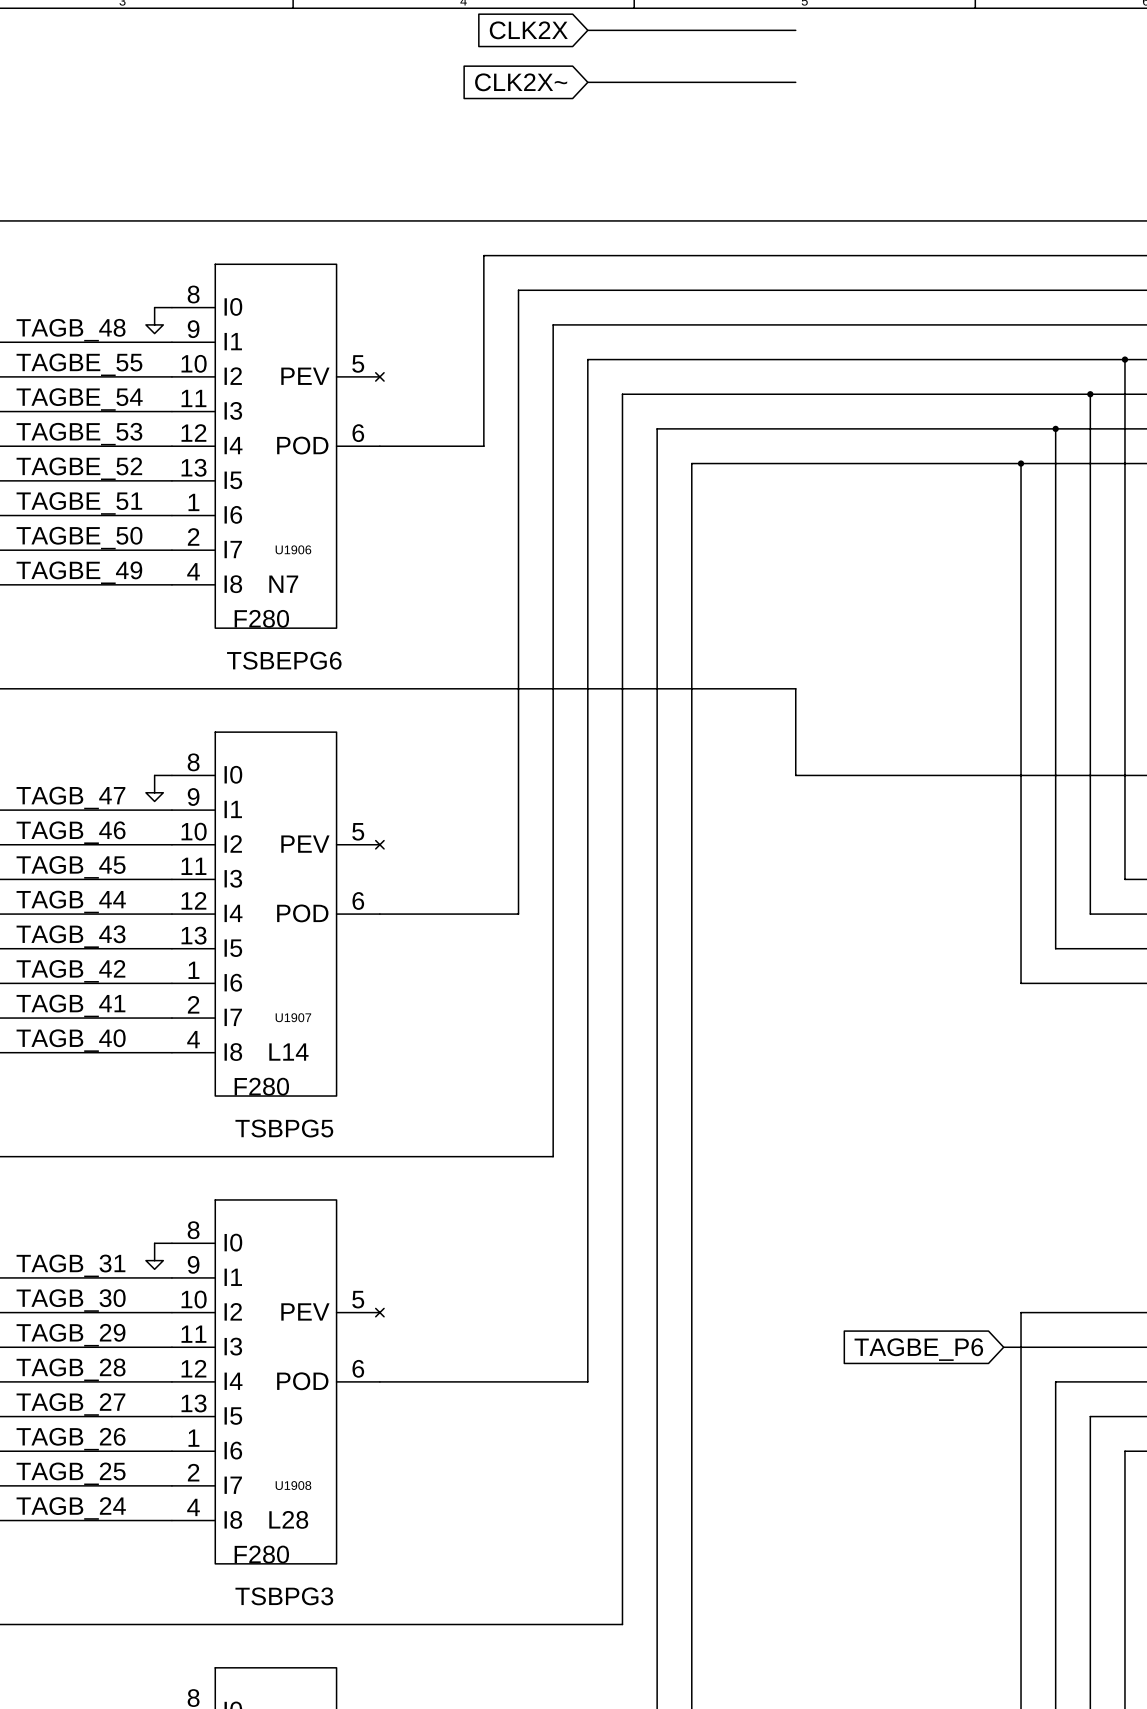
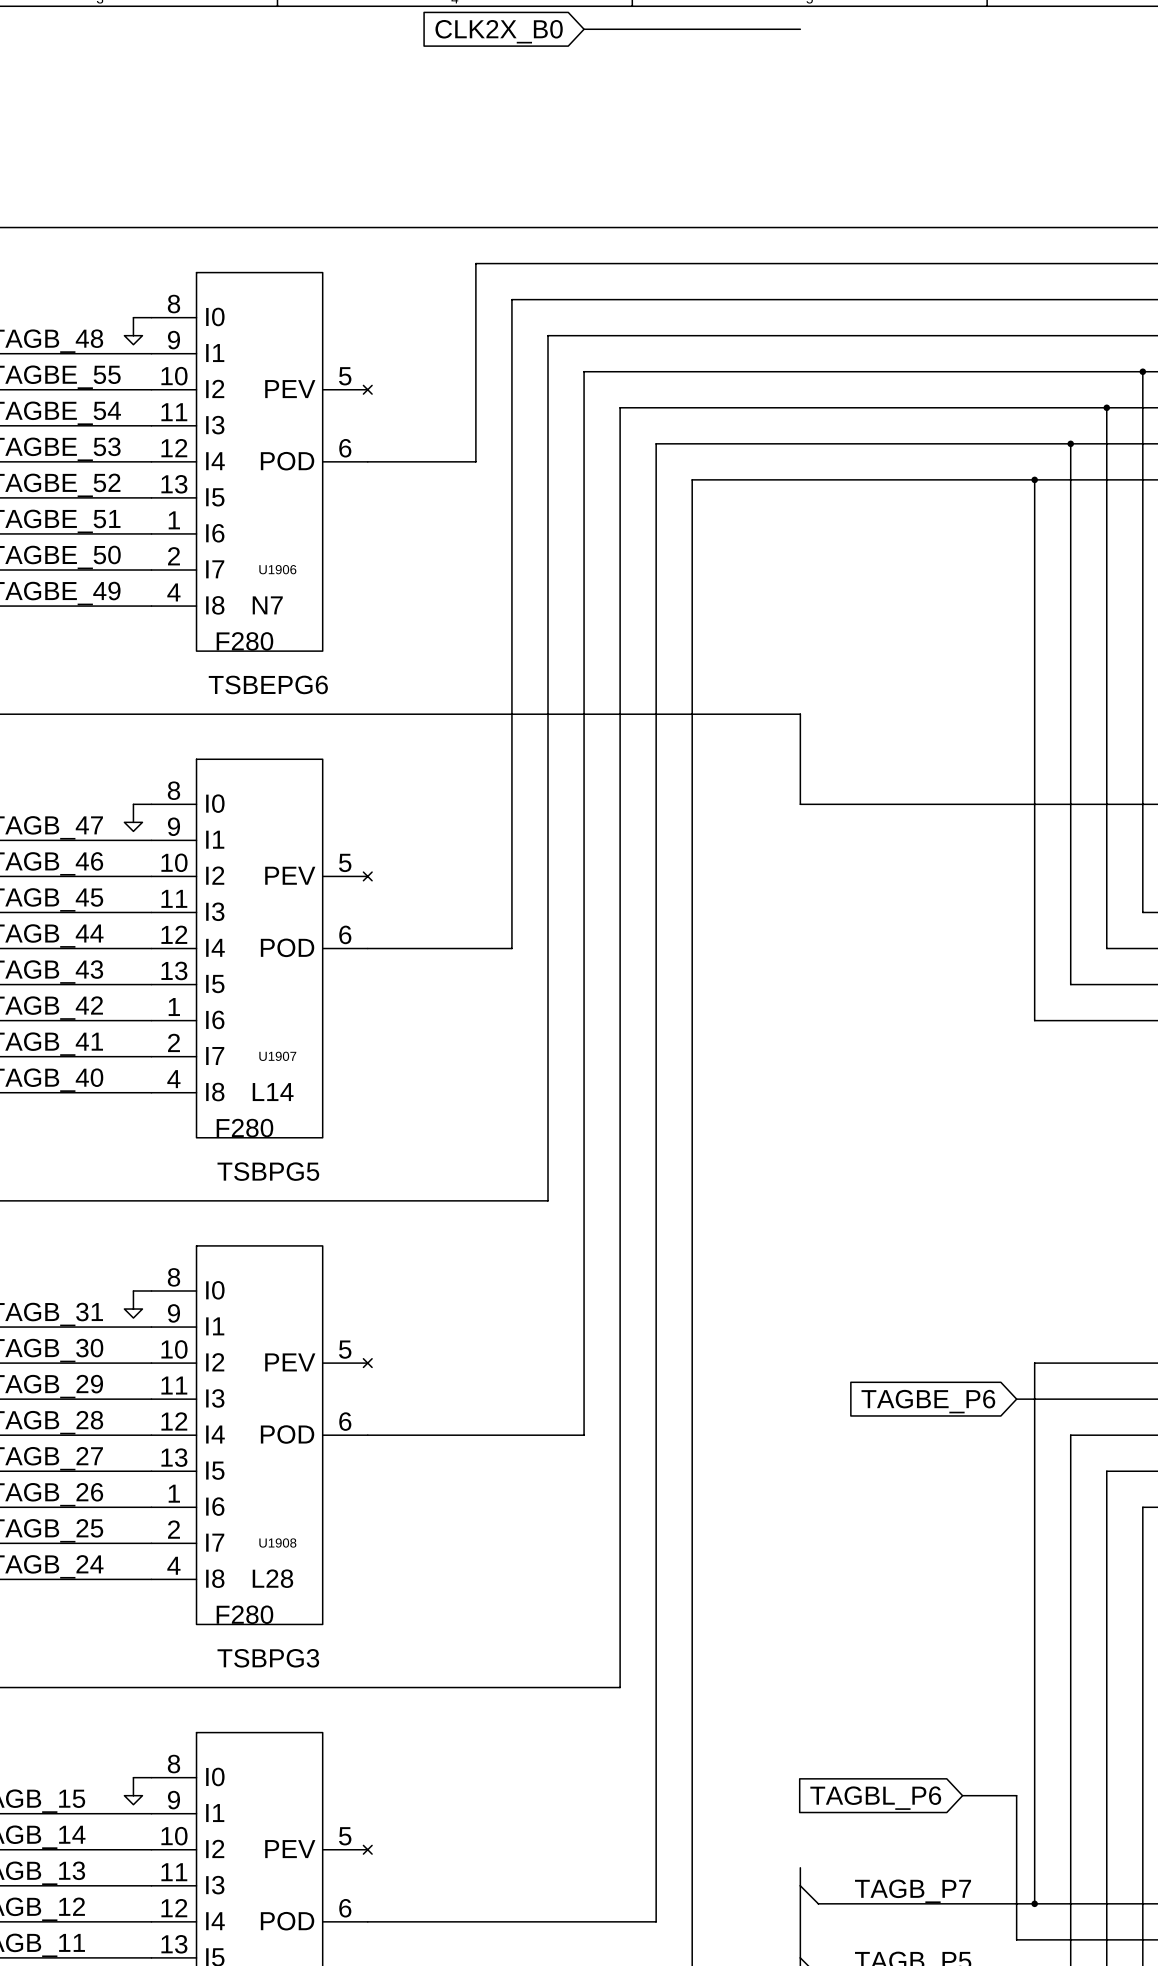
global label: CLK2X (528, 30) -> CLK2X_B0 (499, 31)
global label: CLK2X~ (521, 82) -> none
wire: (587, 82) (795, 82) -> none

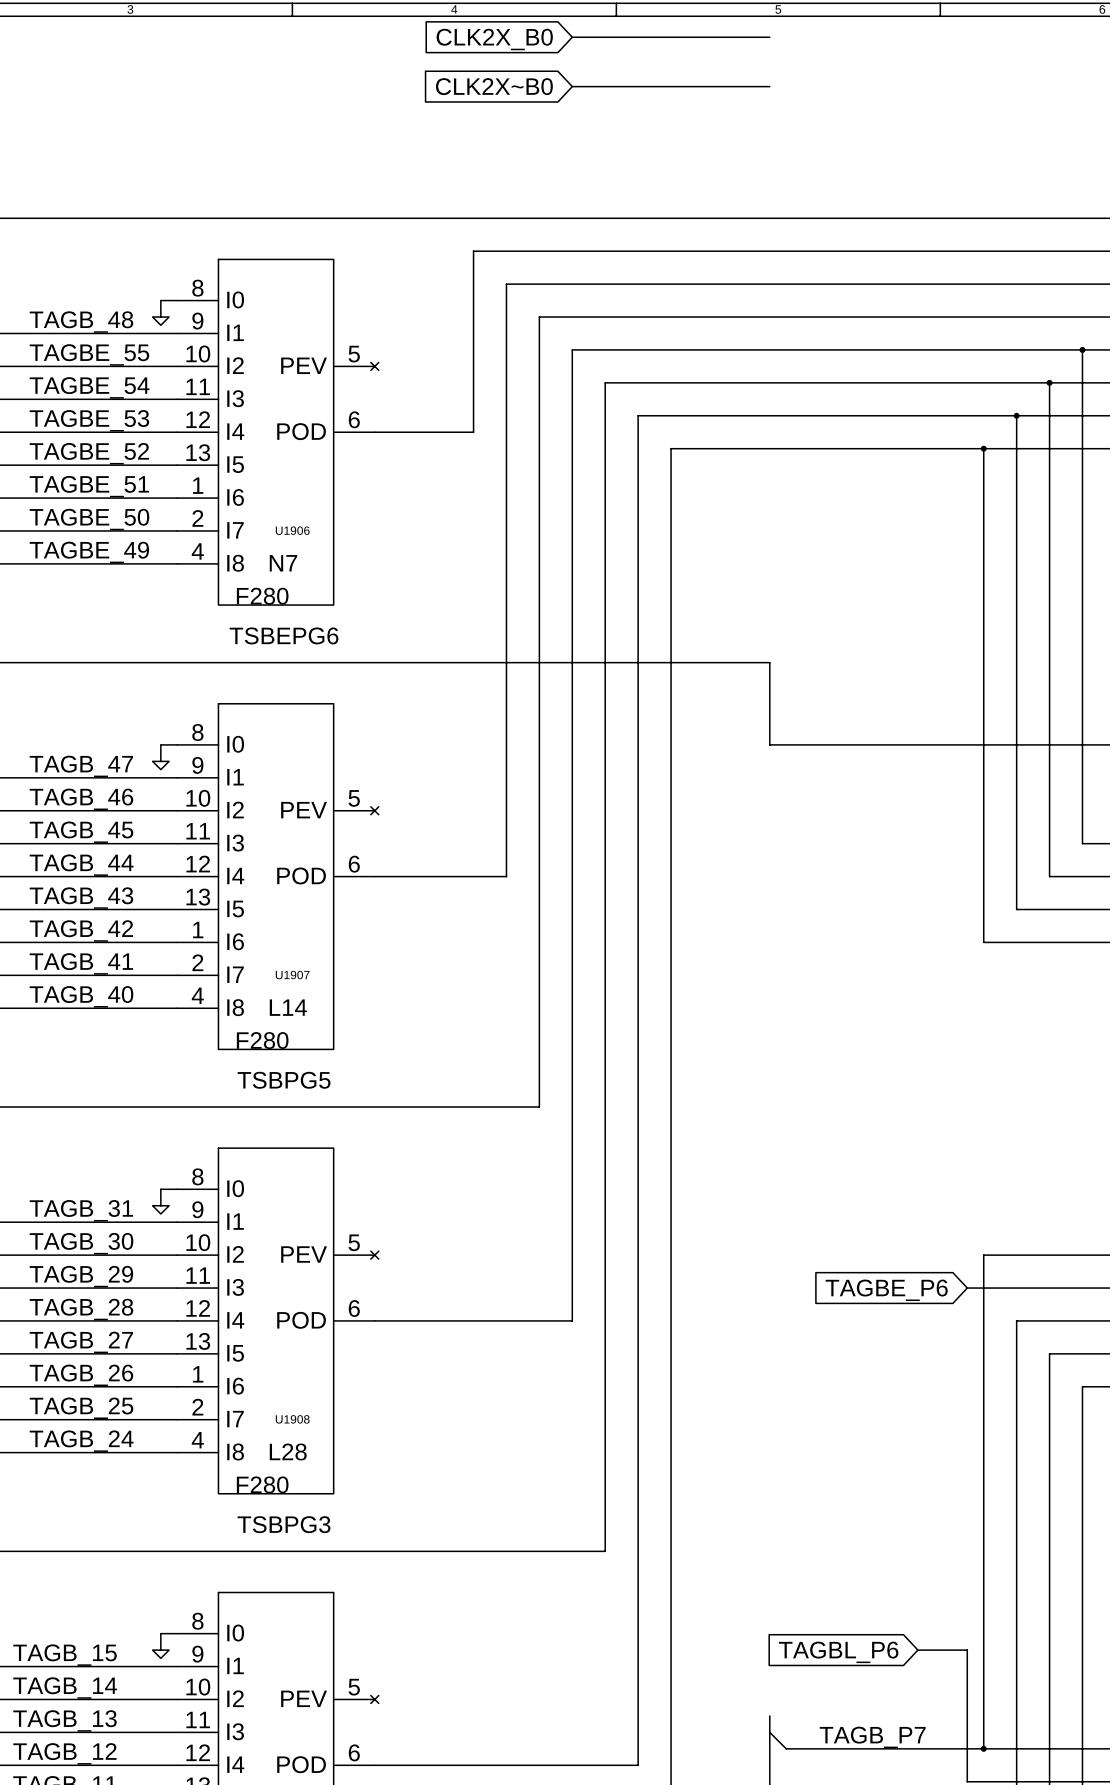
global label: none -> CLK2X~B0 (494, 86)
wire: none -> (572, 86) (769, 86)

